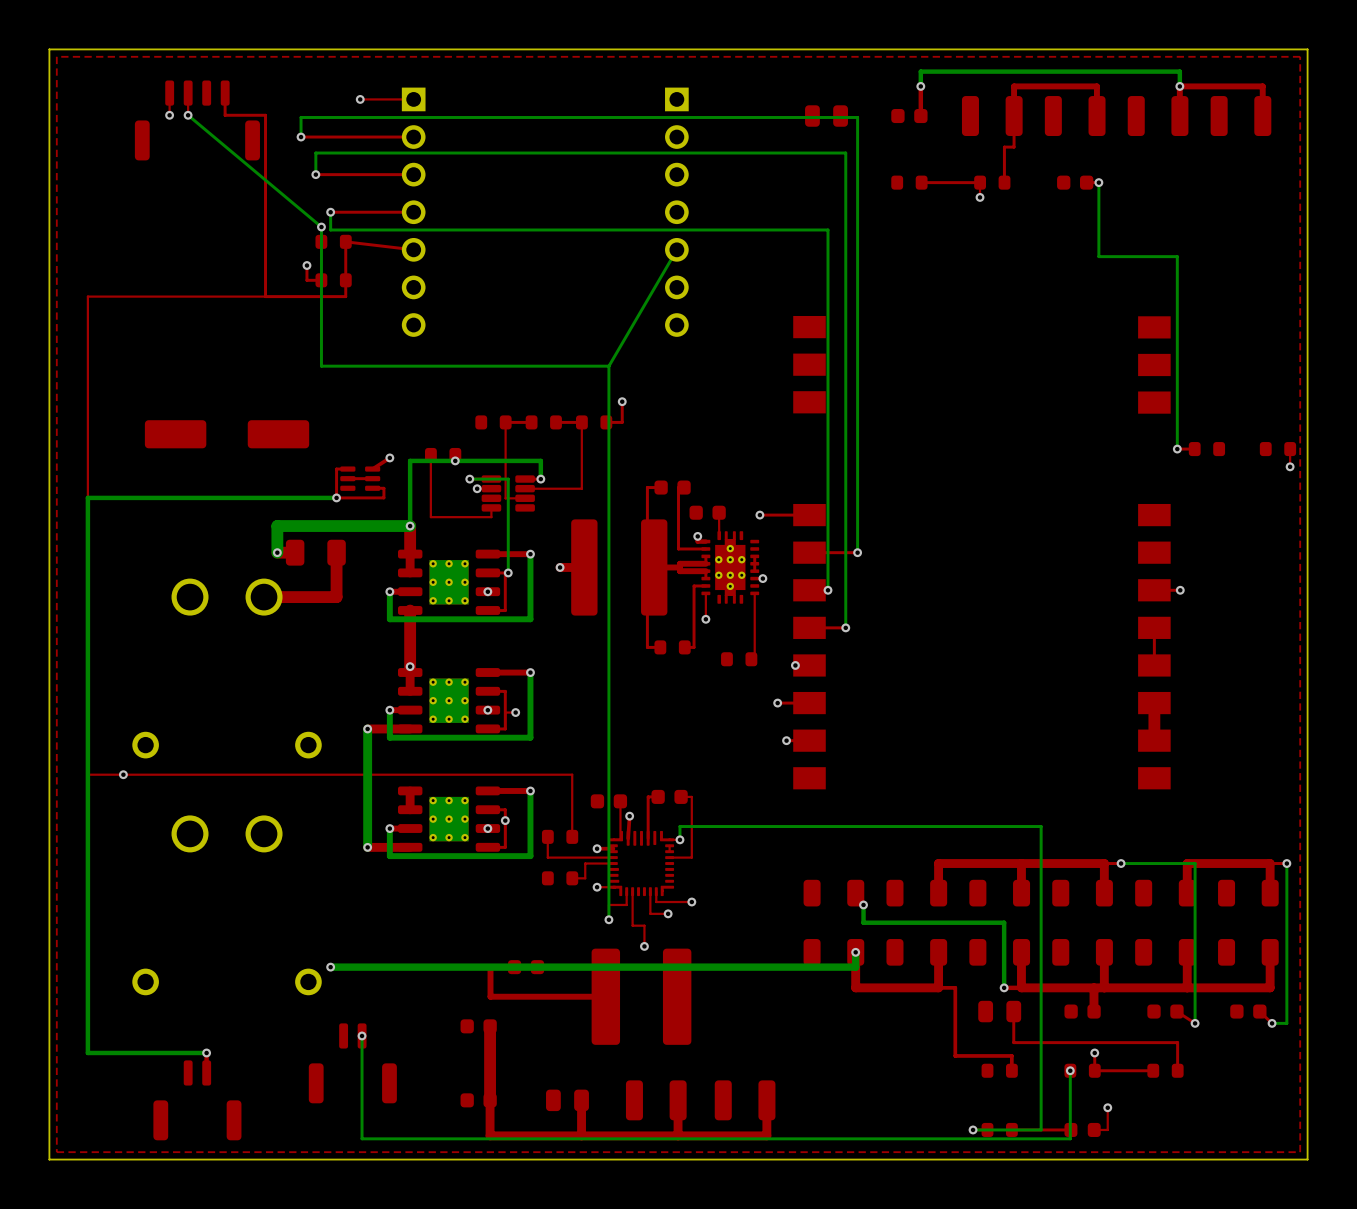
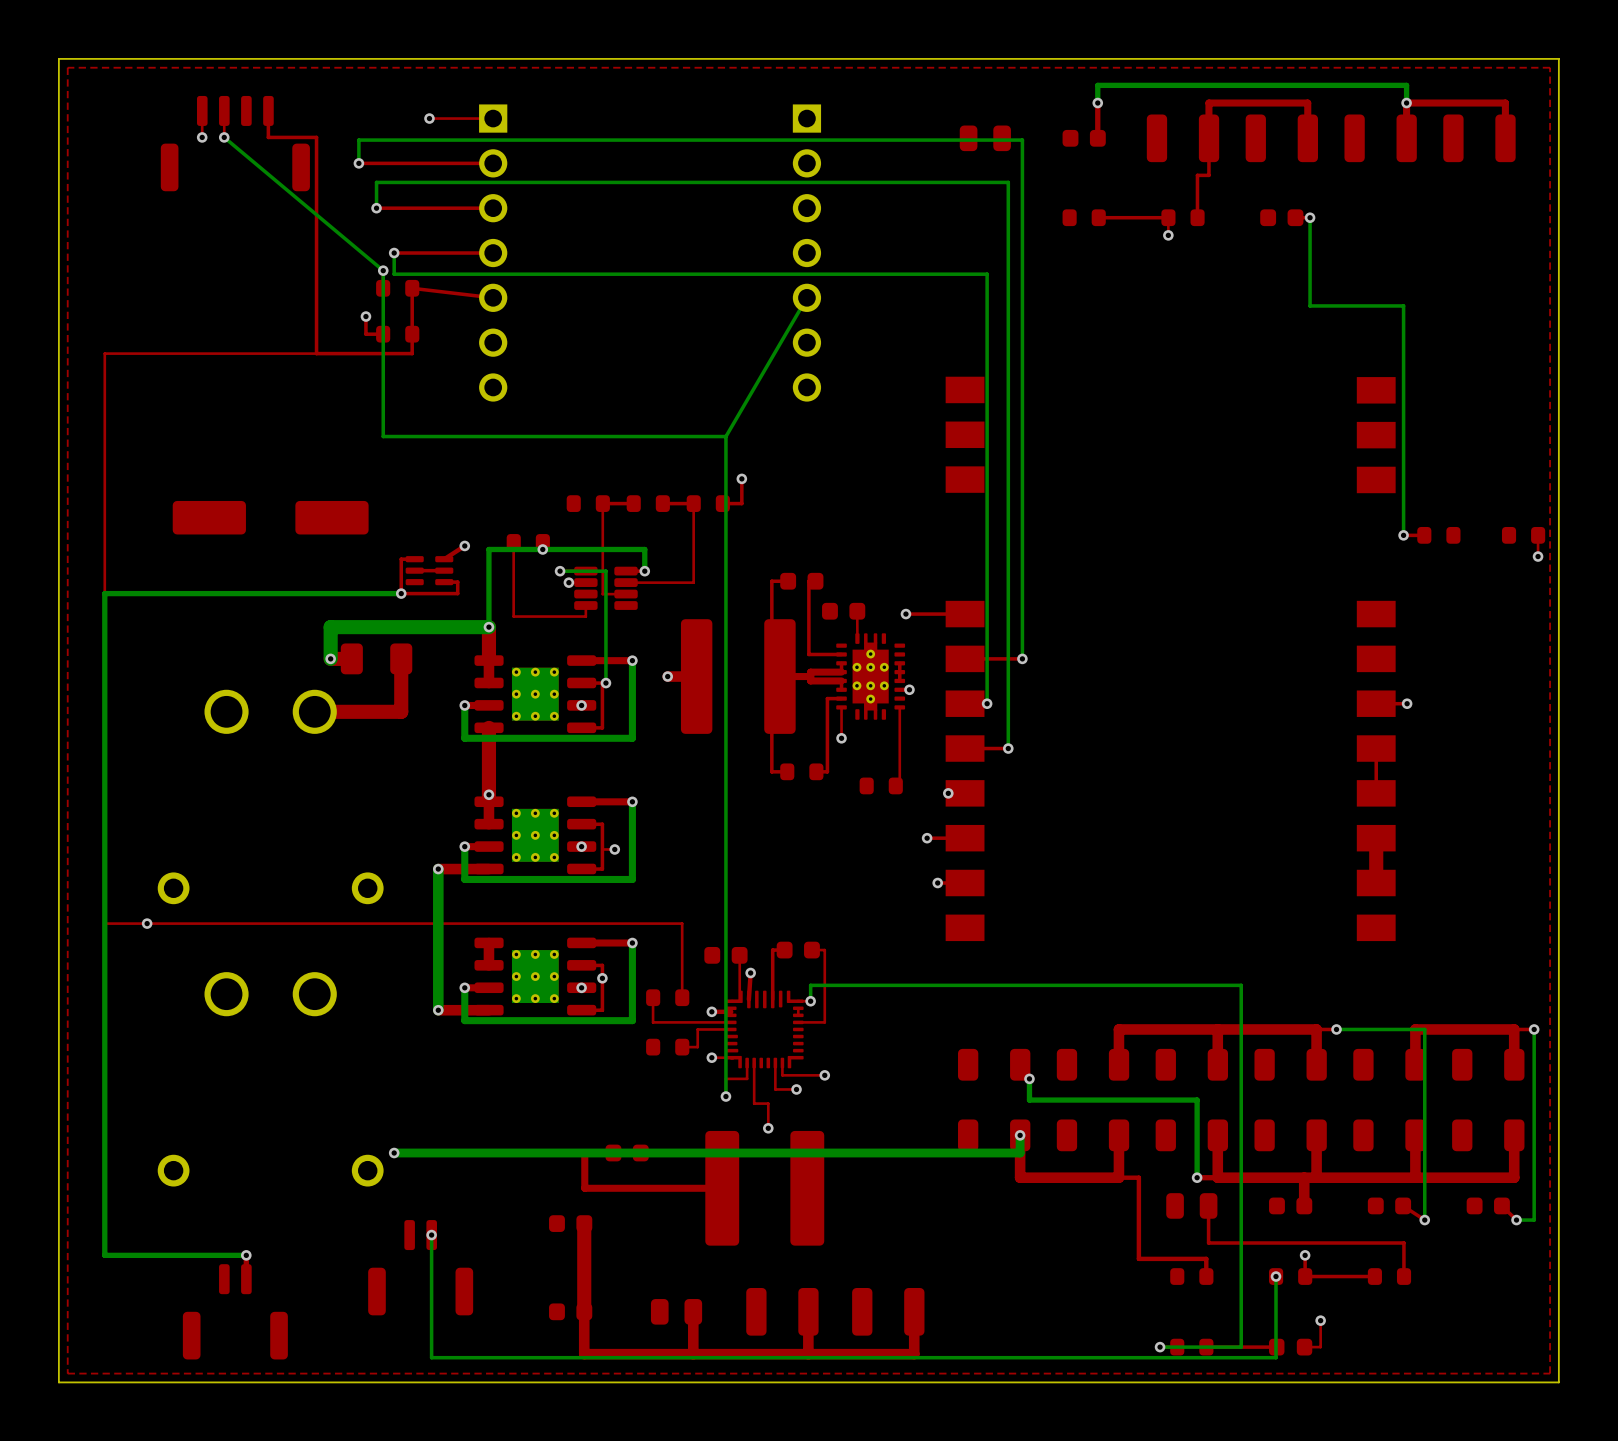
top track: (697, 536) (697, 541) (705, 541) -> none
via: (697, 536) -> none

